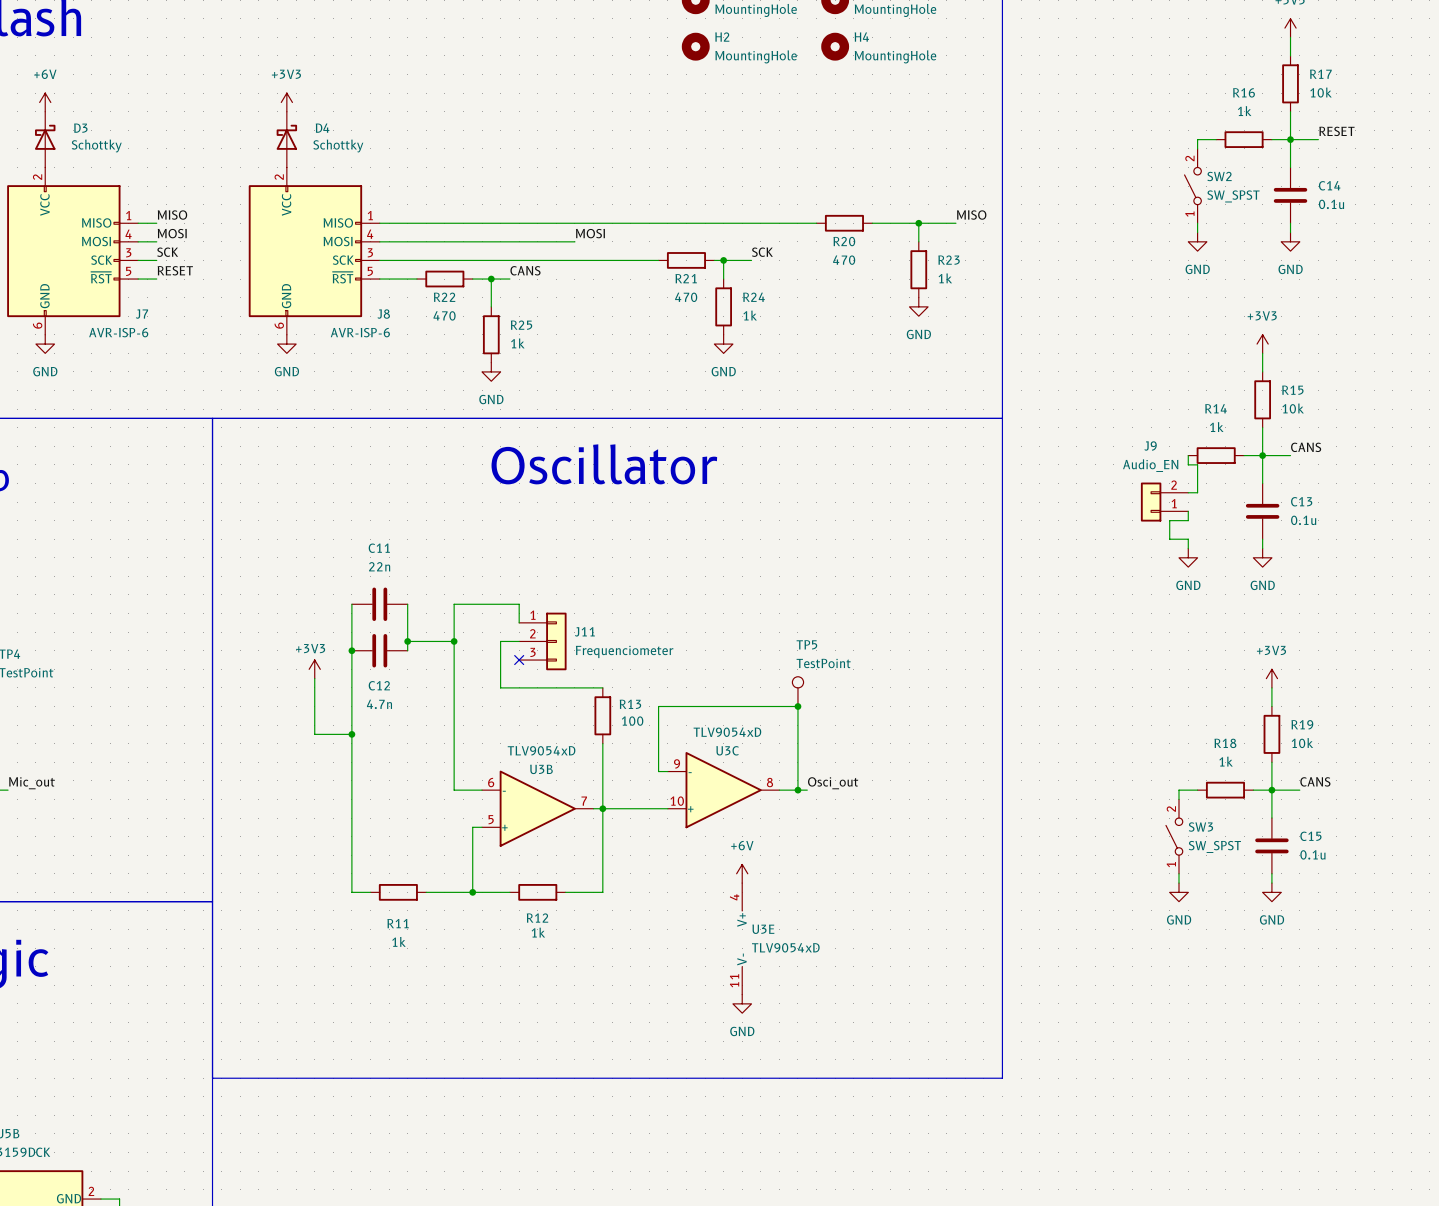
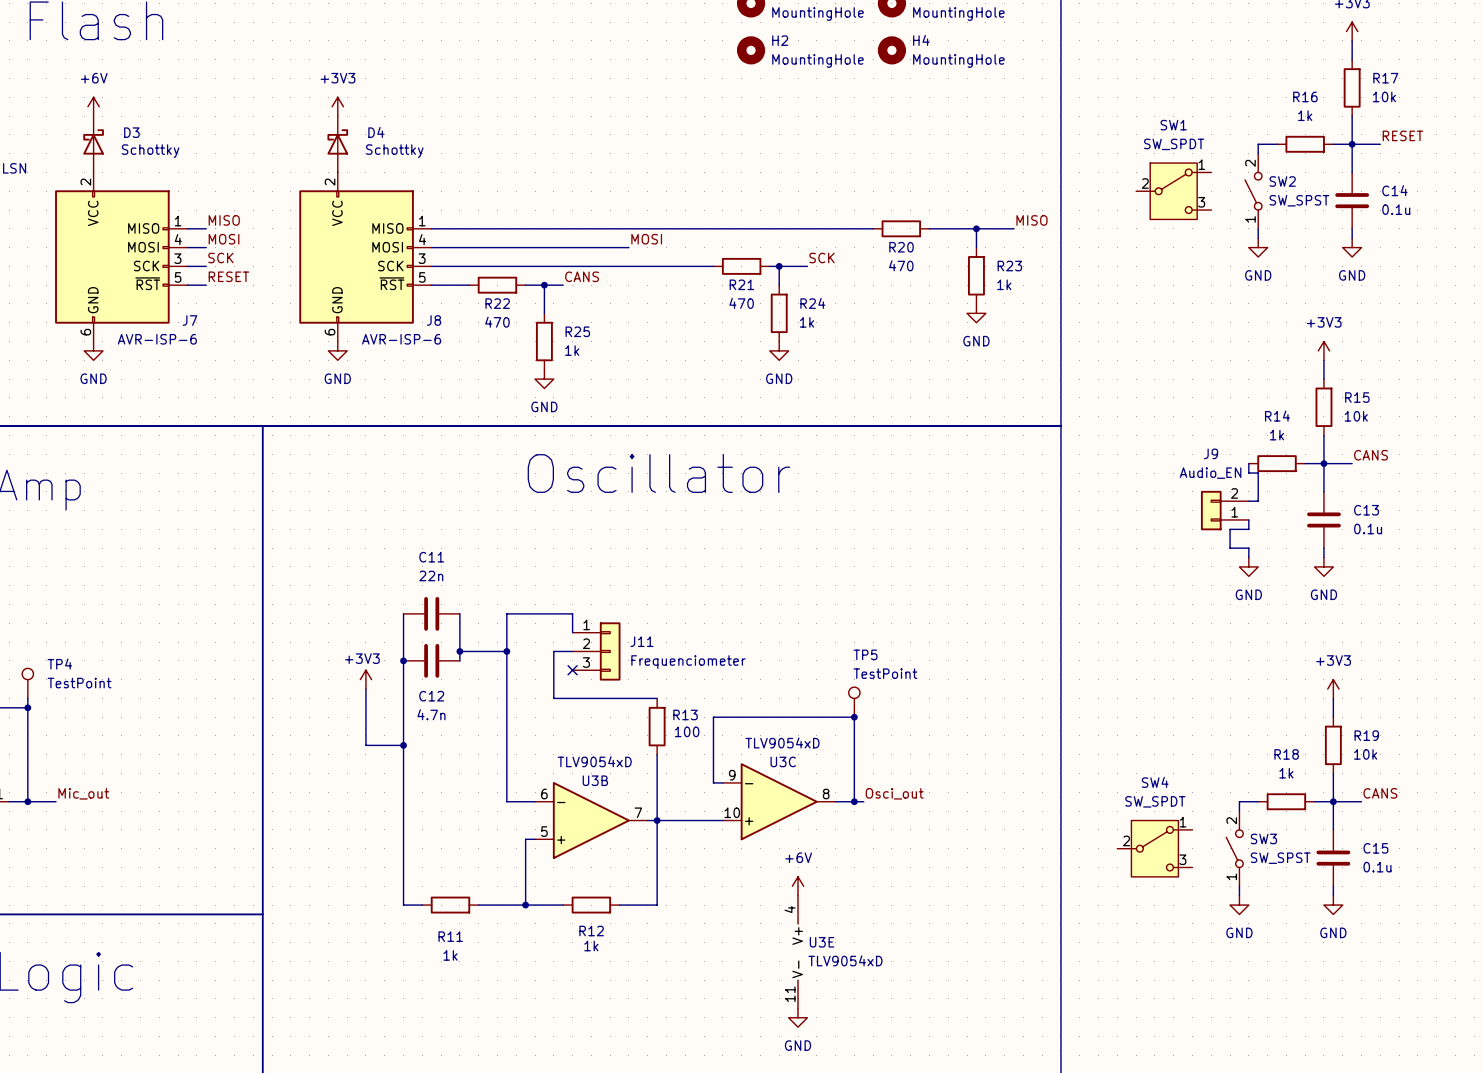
SW1: none -> SW_SPDT (1173, 191)
SW4: none -> SW_SPDT (1154, 848)

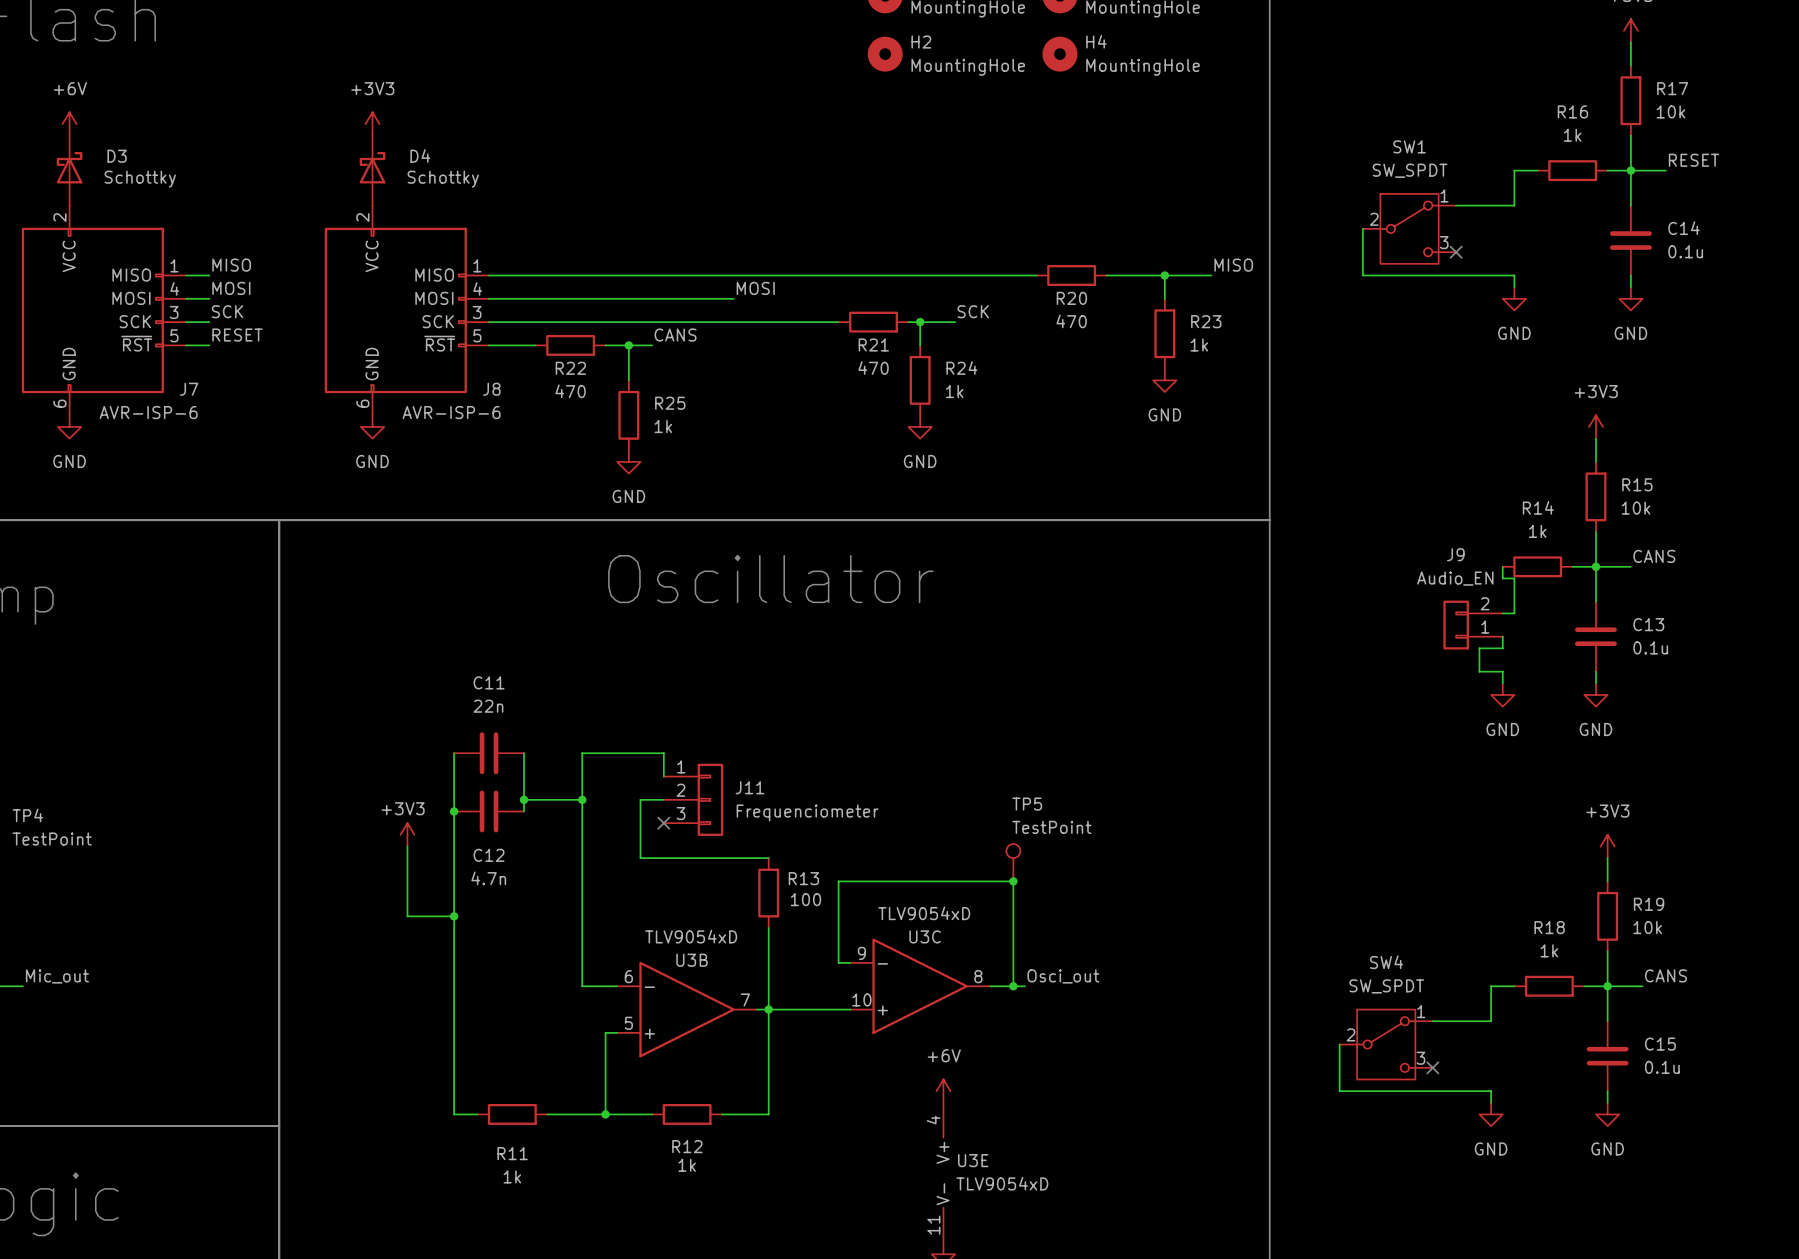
wire: none -> (1514, 182) (1514, 205) (1456, 205)
wire: none -> (1362, 228) (1362, 275) (1514, 275)
SW2: SW_SPST (1253, 191) -> none
no-connect mark: none -> (1456, 252)
wire: none -> (1491, 997) (1491, 1021) (1432, 1021)
wire: none -> (1339, 1044) (1339, 1091) (1491, 1091)
SW3: SW_SPST (1234, 848) -> none
no-connect mark: none -> (1432, 1067)

